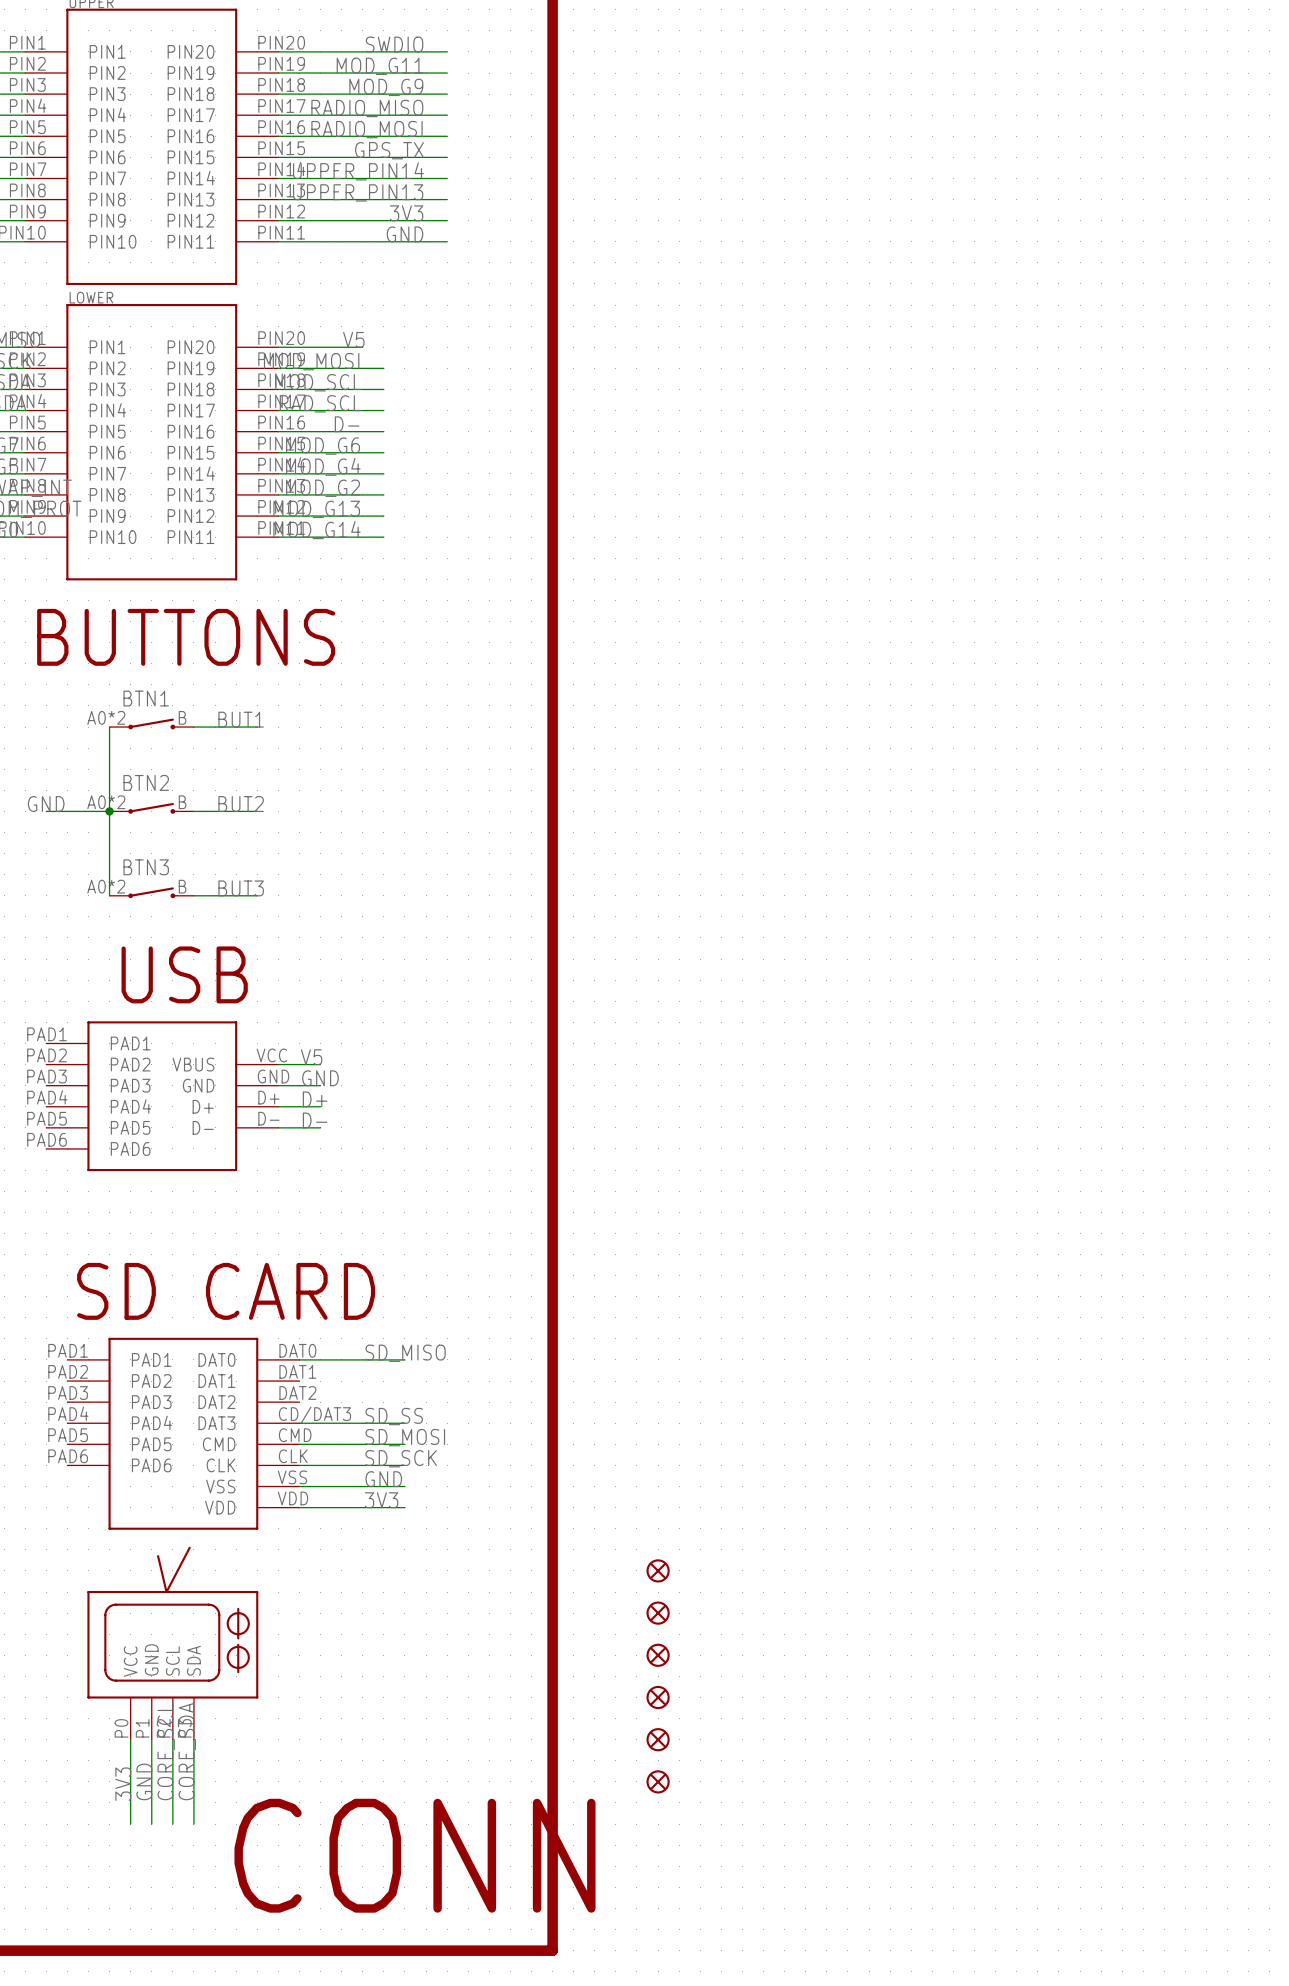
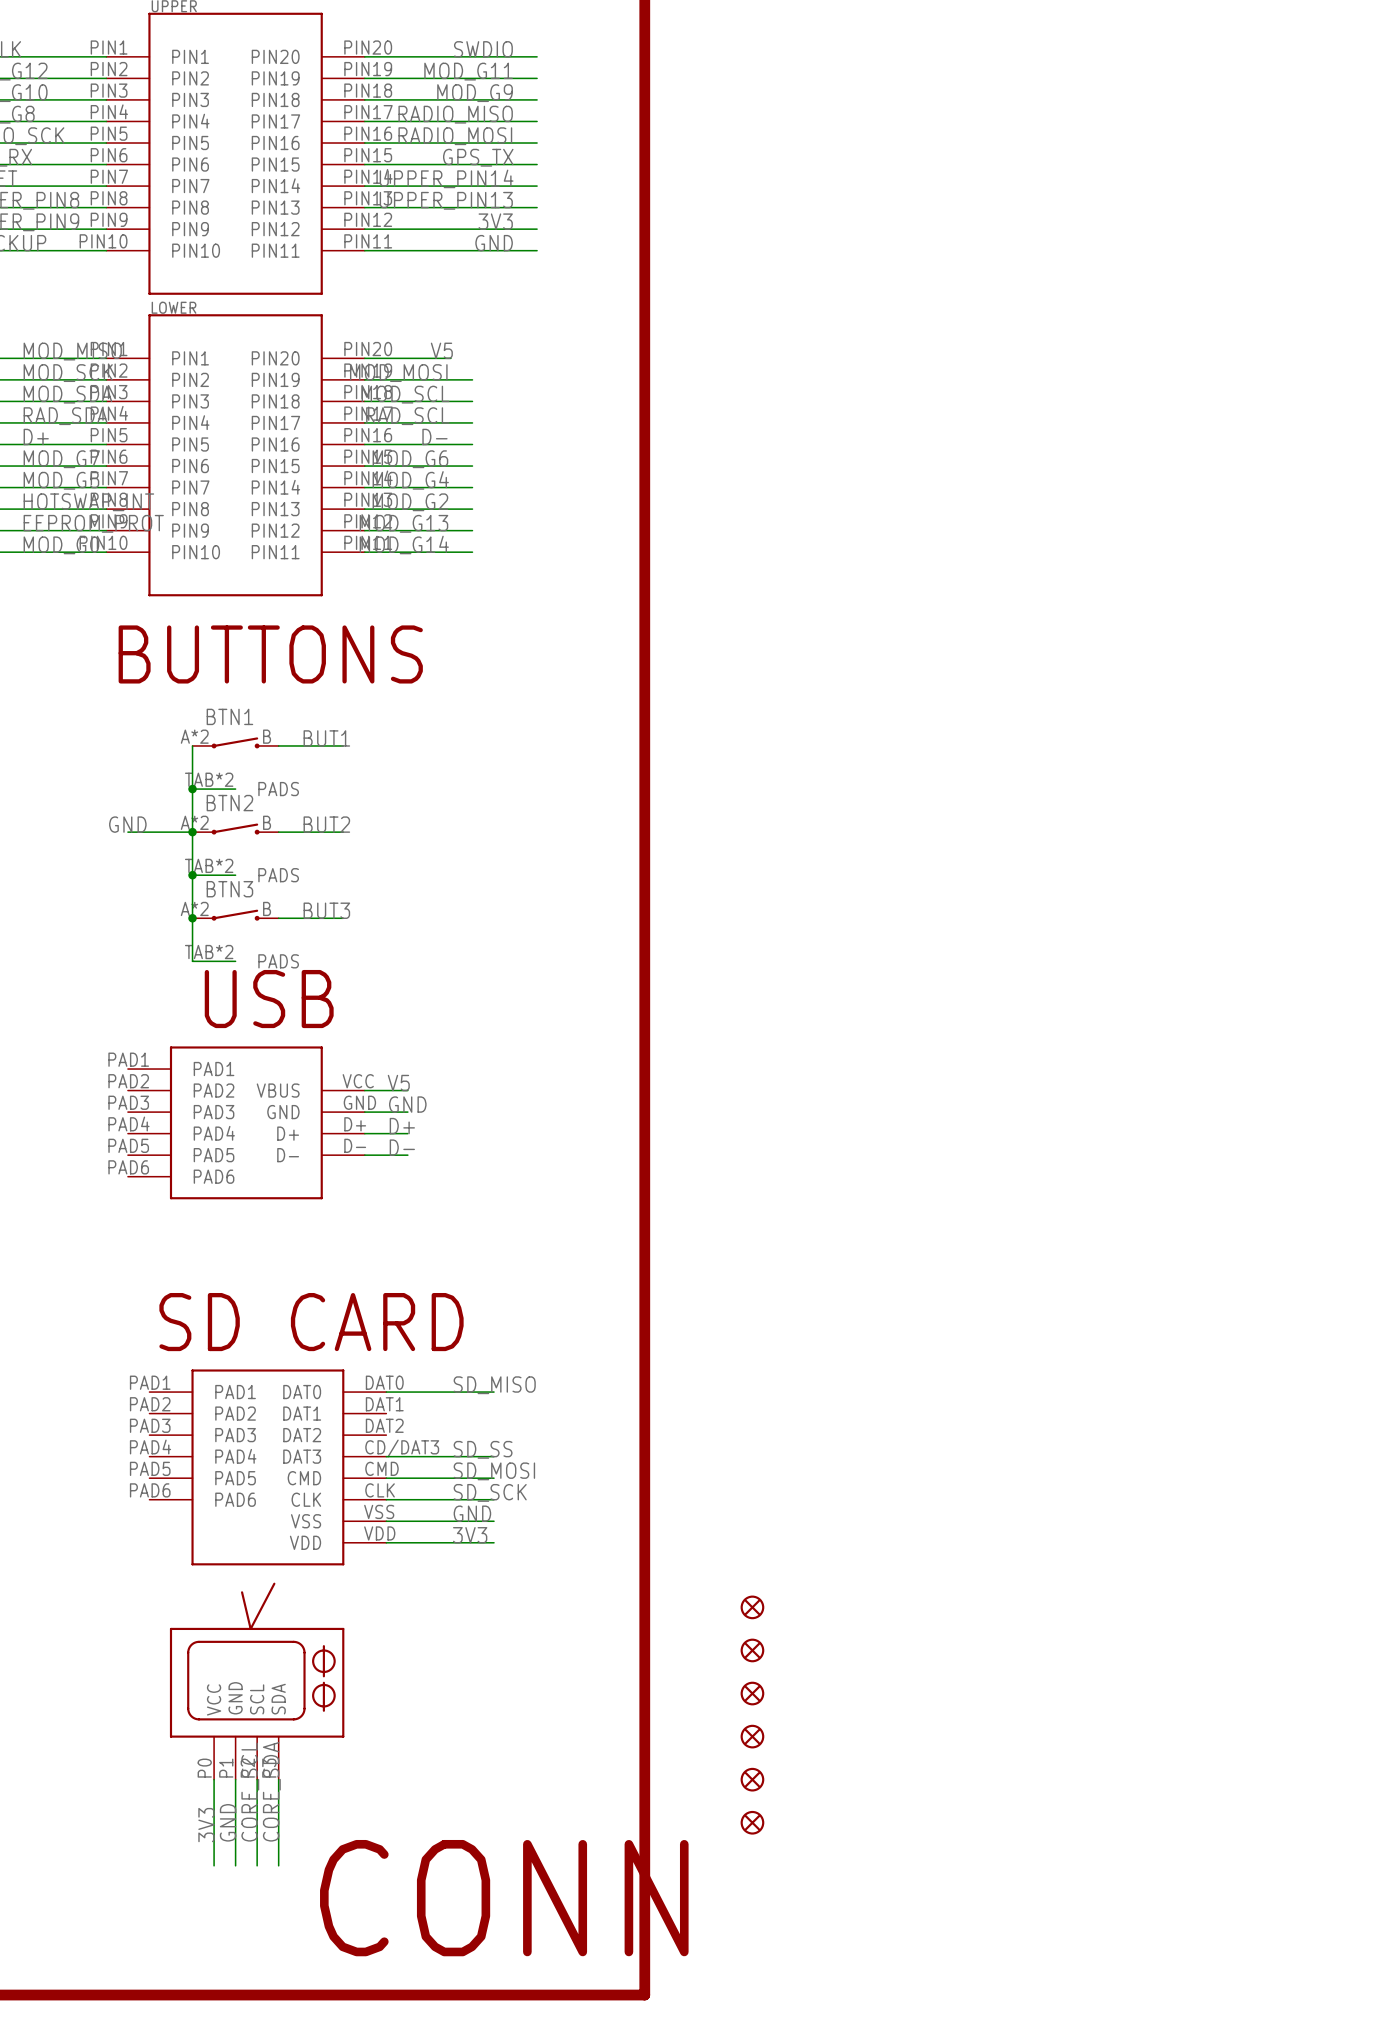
BTN1 pin number: A0*2 (106, 717) -> A*2 (194, 736)
BTN1 pin number: none -> TAB*2 (209, 779)
wire: none -> (192, 789) (235, 789)
junction: none -> (192, 789)
BTN1 pin name: none -> PADS (278, 789)
BTN2 pin number: A0*2 (106, 802) -> A*2 (194, 822)
BTN2 pin number: none -> TAB*2 (209, 865)
wire: none -> (192, 875) (235, 875)
junction: none -> (192, 875)
BTN2 pin name: none -> PADS (278, 875)
BTN3 pin number: A0*2 (106, 886) -> A*2 (194, 908)
wire: none -> (192, 918) (192, 961) (235, 961)
junction: none -> (192, 918)
BTN3 pin number: none -> TAB*2 (209, 952)
BTN3 pin name: none -> PADS (278, 961)

